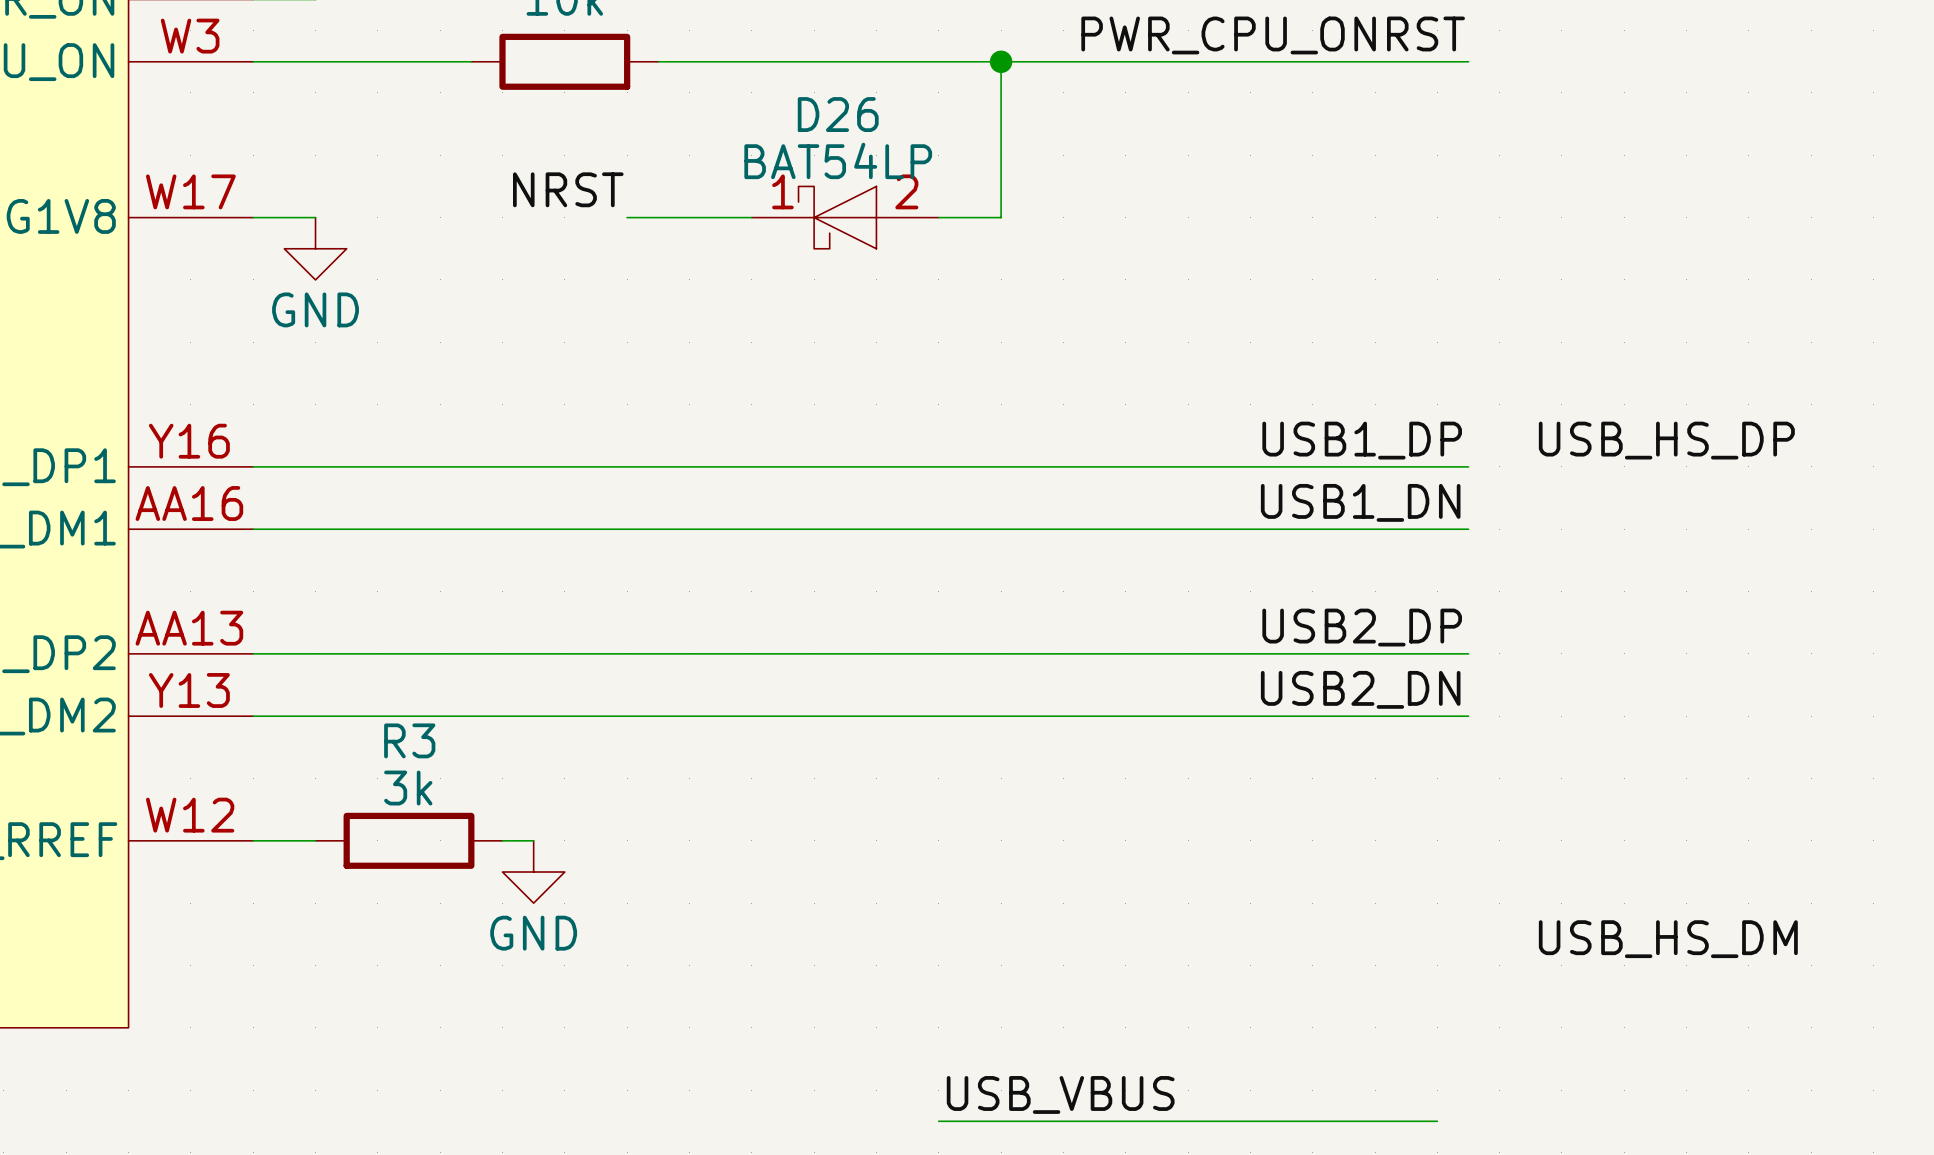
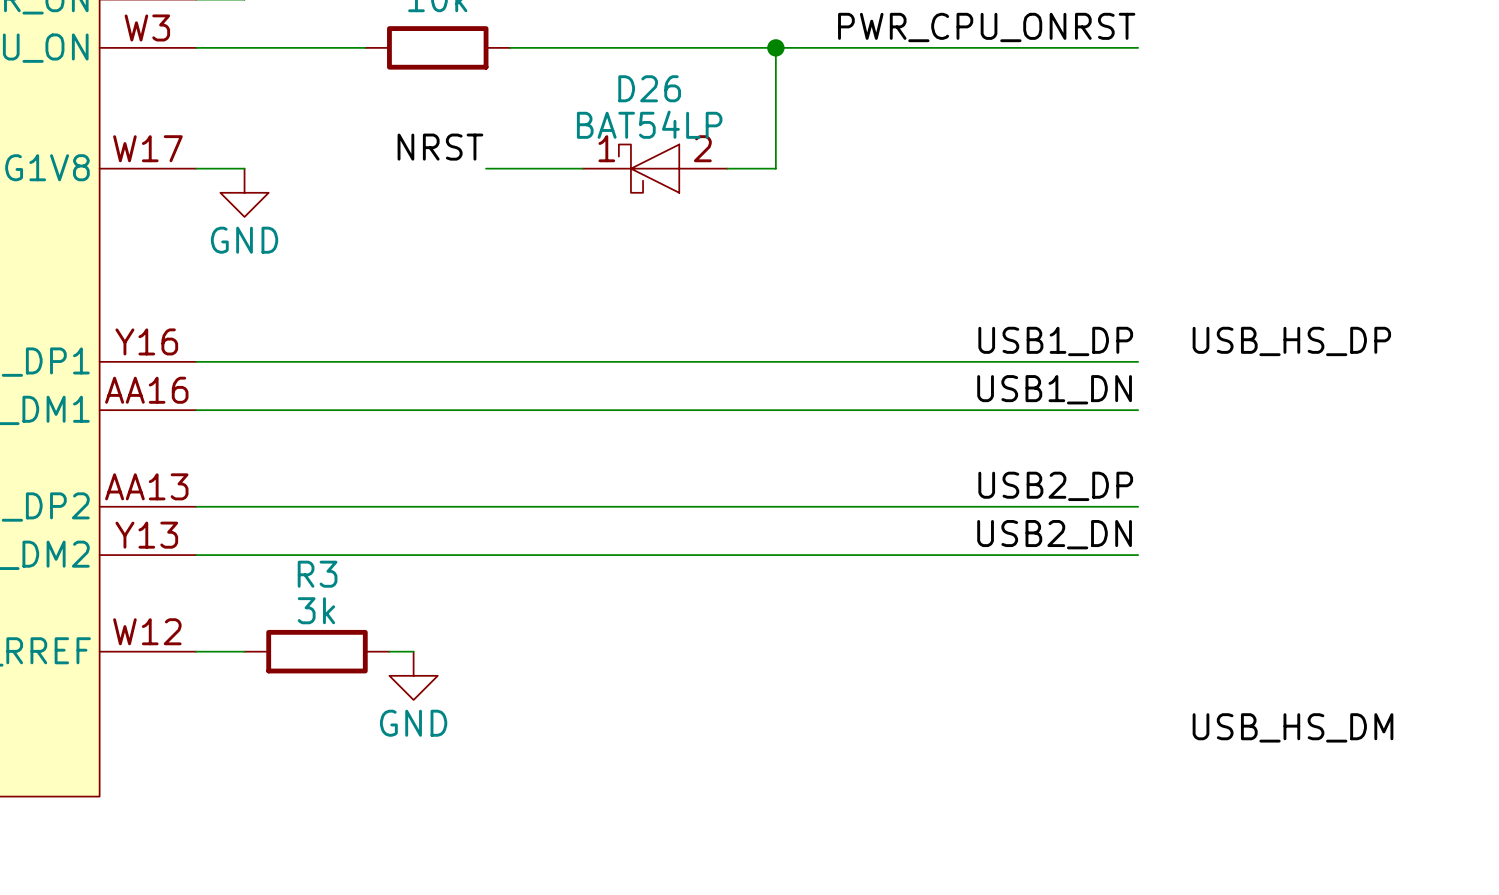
label: USB_VBUS (1060, 1094) -> none
wire: (938, 1121) (1437, 1121) -> none

